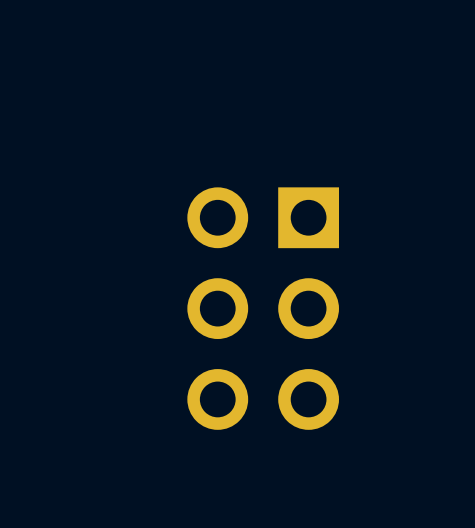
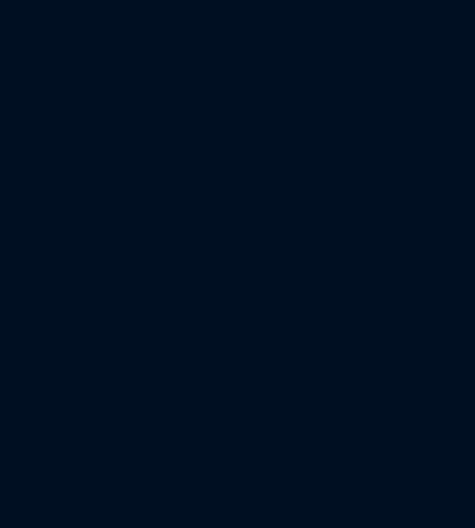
part: (263, 308) -> none

